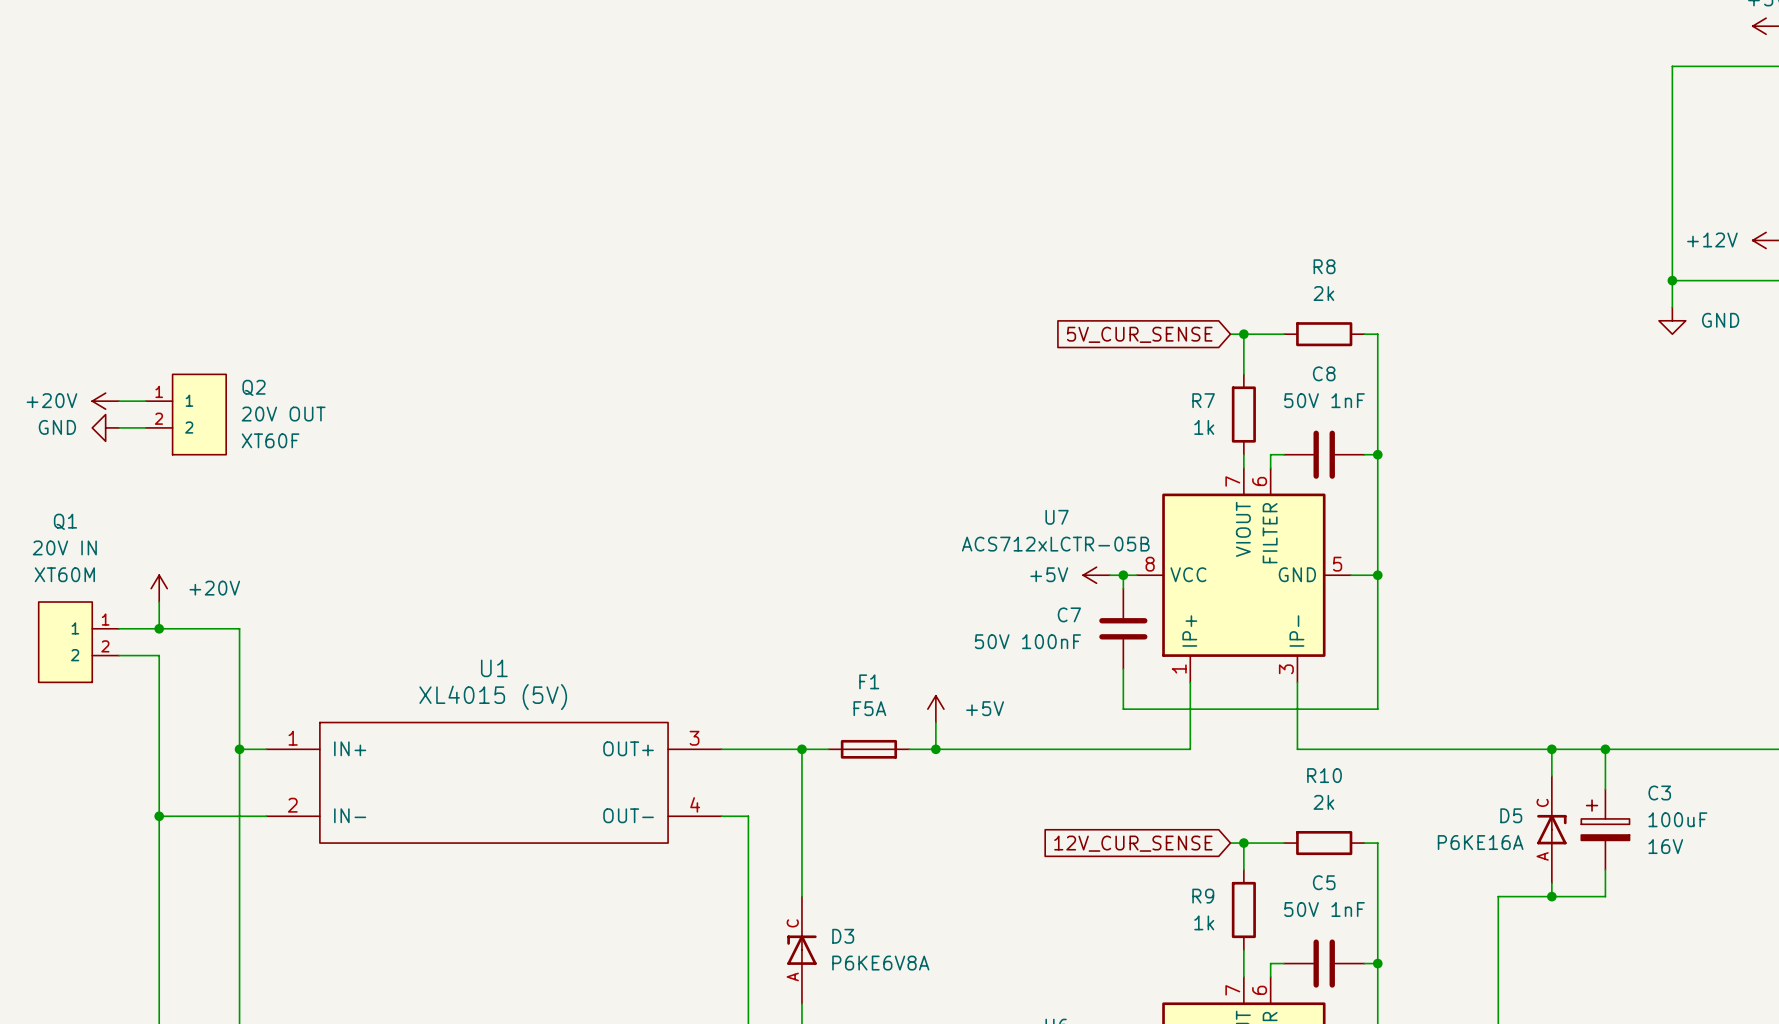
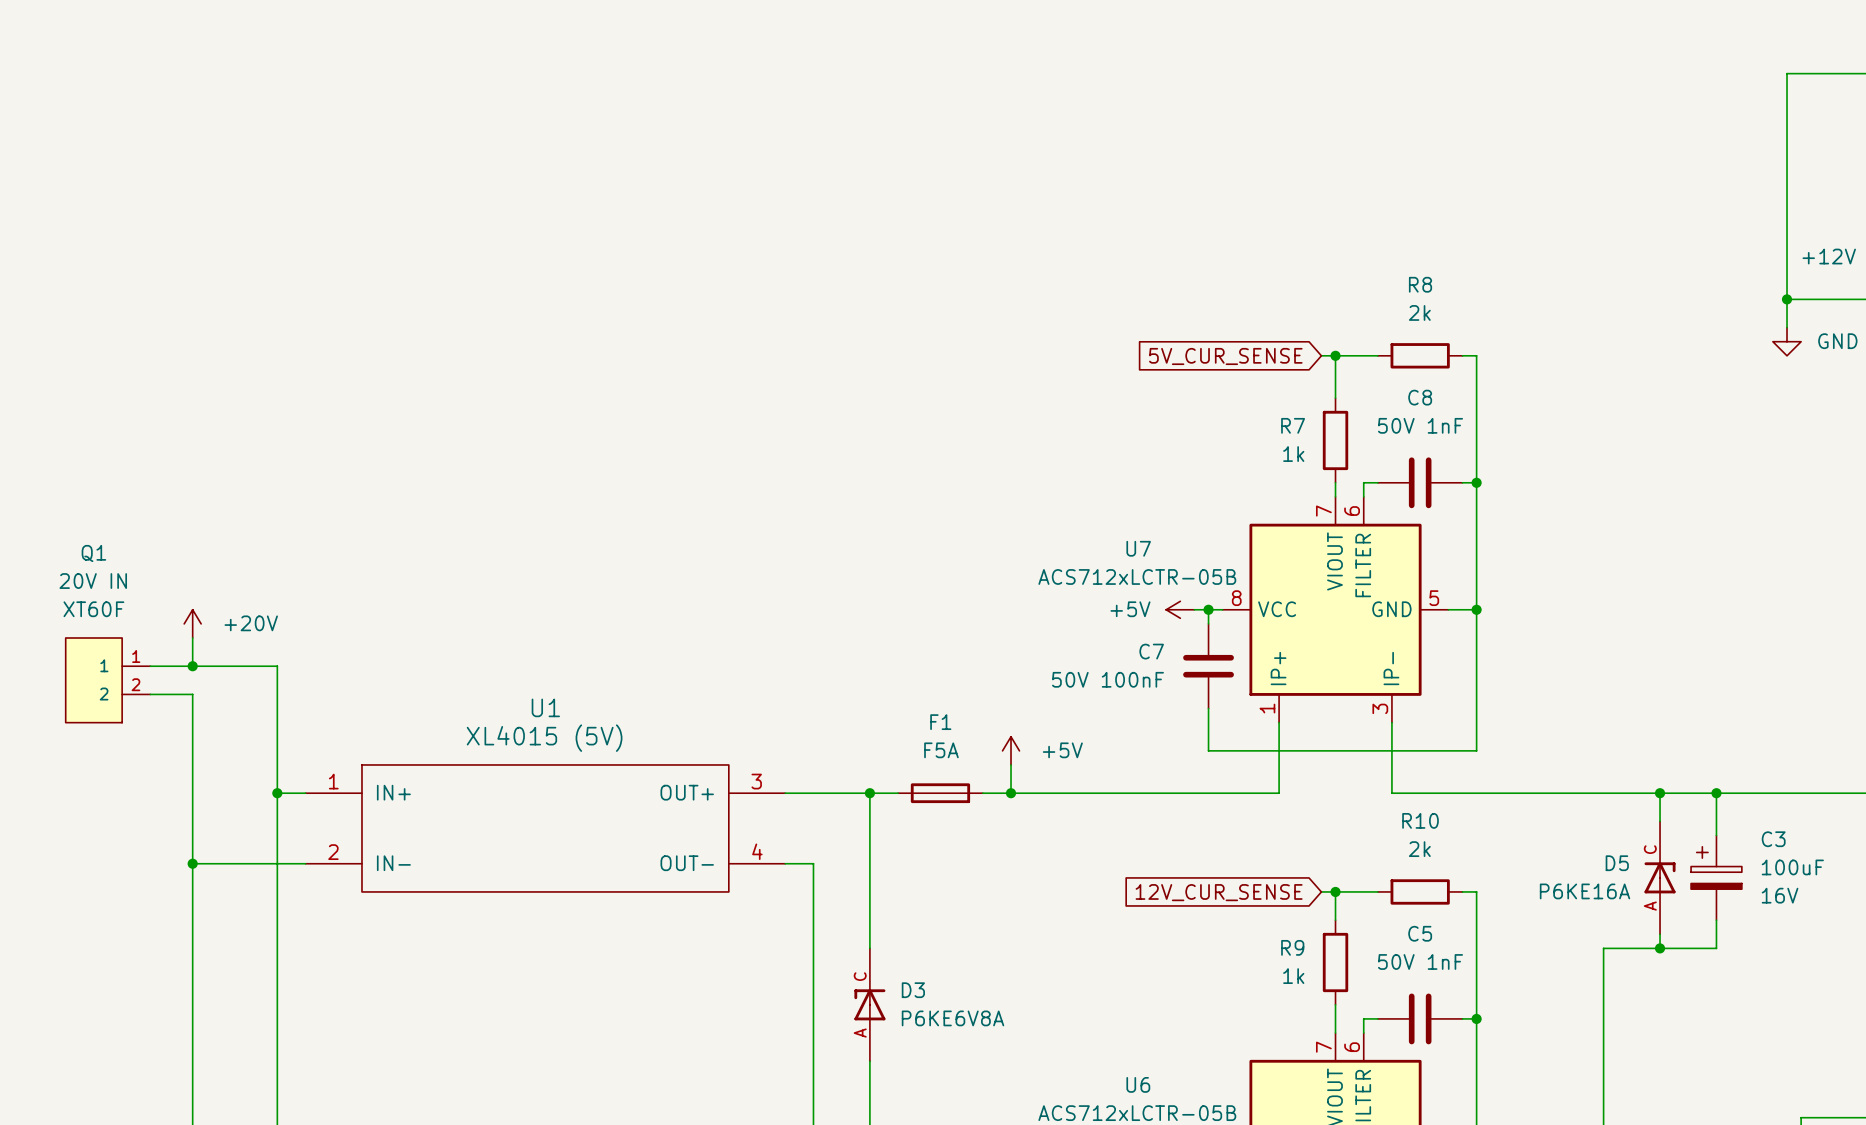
power symbol: +20V (105, 401) -> none
wire: (119, 401) (145, 401) -> none
Q2: 20V OUT (186, 414) -> none
power symbol: GND (105, 427) -> none
wire: (119, 427) (145, 427) -> none
Q1 text: XT60M (64, 574) -> XT60F (93, 609)

